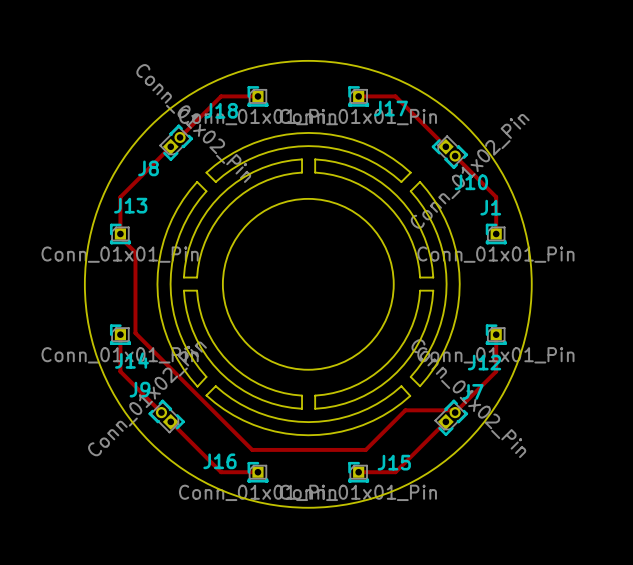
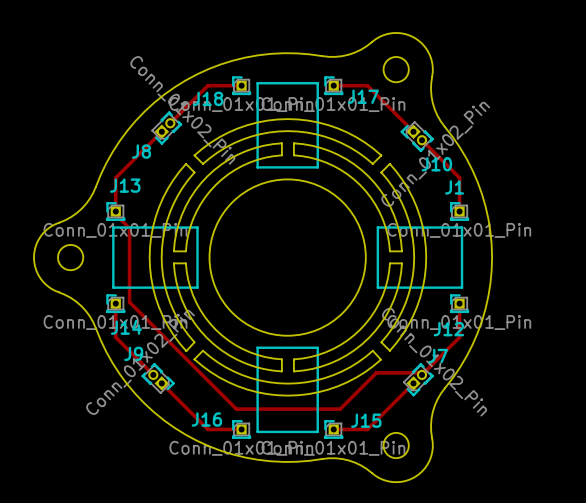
board edge: none -> (372, 42) (383, 35) (401, 33) (414, 37) (427, 50) (432, 63) (431, 90) (434, 109) (466, 158) (477, 182) (488, 219) (491, 244) (491, 270) (485, 308) (477, 333) (466, 356) (434, 405) (431, 418) (432, 447) (429, 460) (424, 468) (414, 477) (397, 482) (379, 478) (361, 465) (348, 460) (335, 458) (296, 461) (258, 459) (220, 450) (185, 434) (164, 420) (135, 394) (112, 363) (86, 311) (70, 297) (50, 288) (43, 282) (36, 270) (33, 257) (36, 244) (43, 232) (50, 226) (70, 217) (86, 204) (112, 151) (127, 130) (144, 111) (174, 87) (208, 69) (245, 57) (283, 53) (342, 56) (361, 49) (372, 42)
round board edge: [84, 60, 533, 509] -> none
round board edge: none -> [382, 56, 410, 83]
line: none -> (257, 83) (317, 83) (317, 167) (257, 167) (257, 83)
line: none -> (113, 227) (197, 227) (197, 287) (113, 287) (113, 227)
line: none -> (377, 227) (462, 227) (462, 287) (377, 287) (377, 227)
round board edge: none -> [57, 244, 84, 271]
line: none -> (257, 347) (257, 431) (317, 431) (317, 347) (257, 347)
round board edge: none -> [382, 432, 410, 459]

